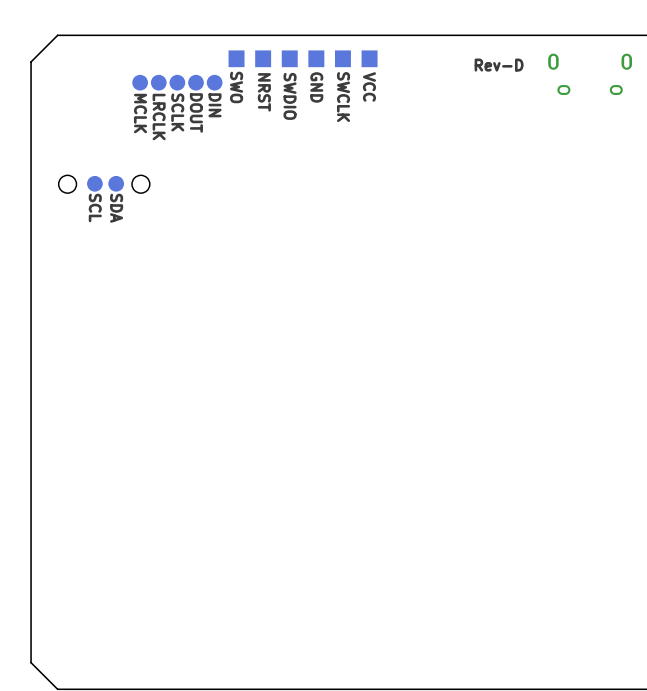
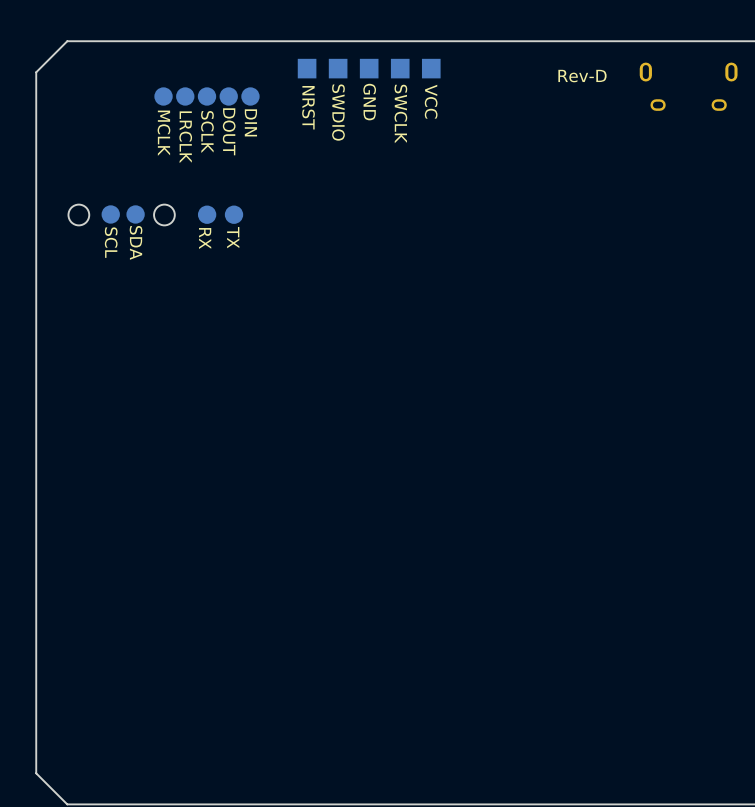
part: (303, 58) -> none
text: SWO (236, 87) -> none
part: none -> (207, 214)
part: none -> (234, 214)
text: none -> TX (233, 237)
text: none -> RX (205, 238)

